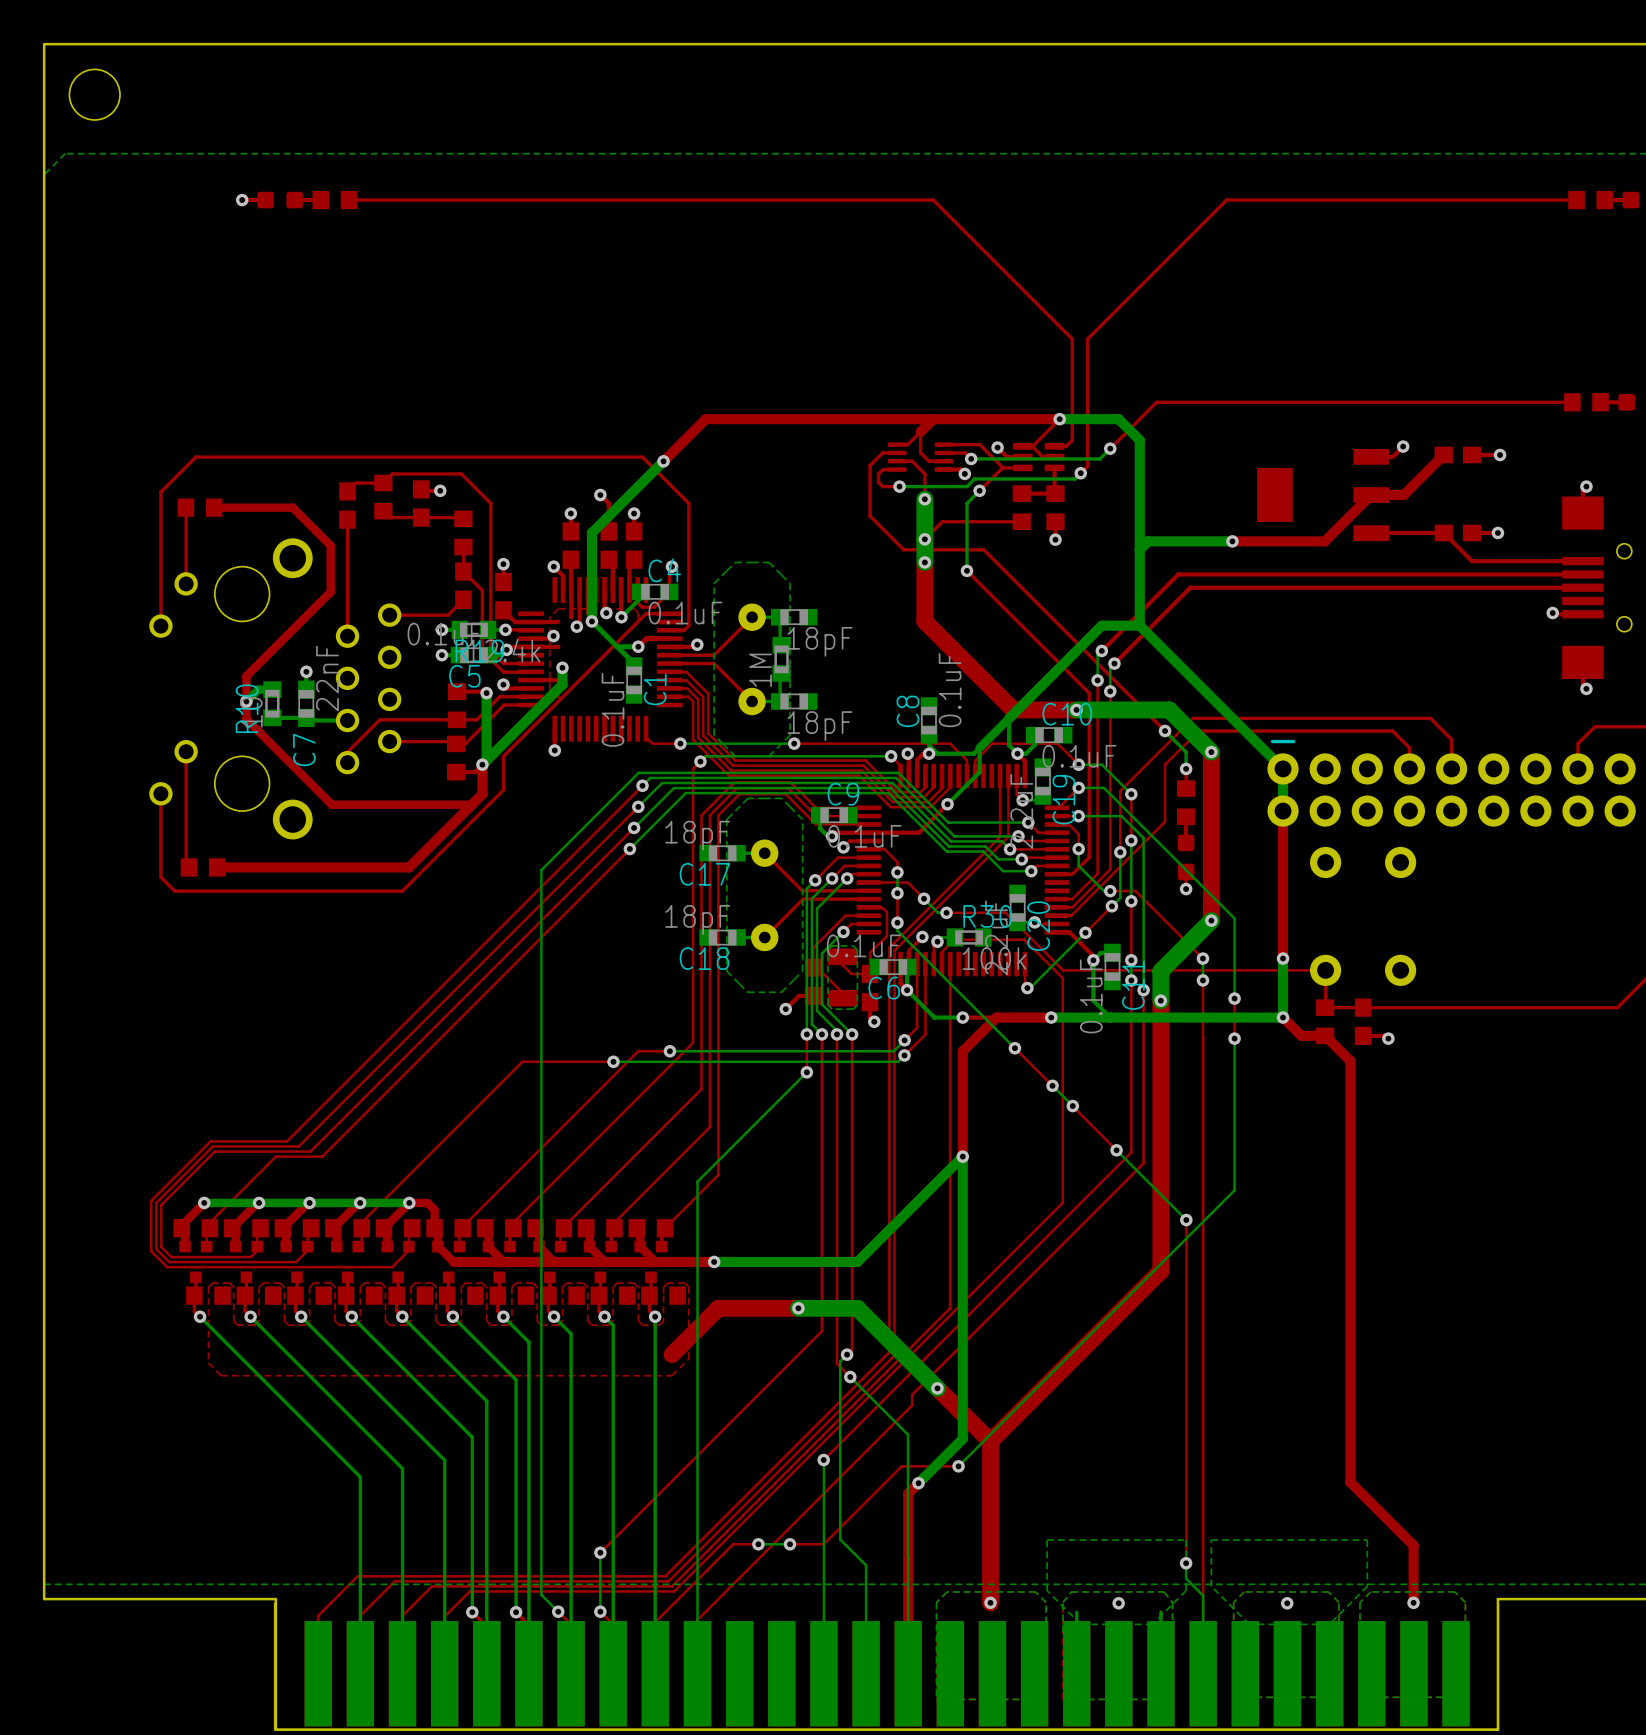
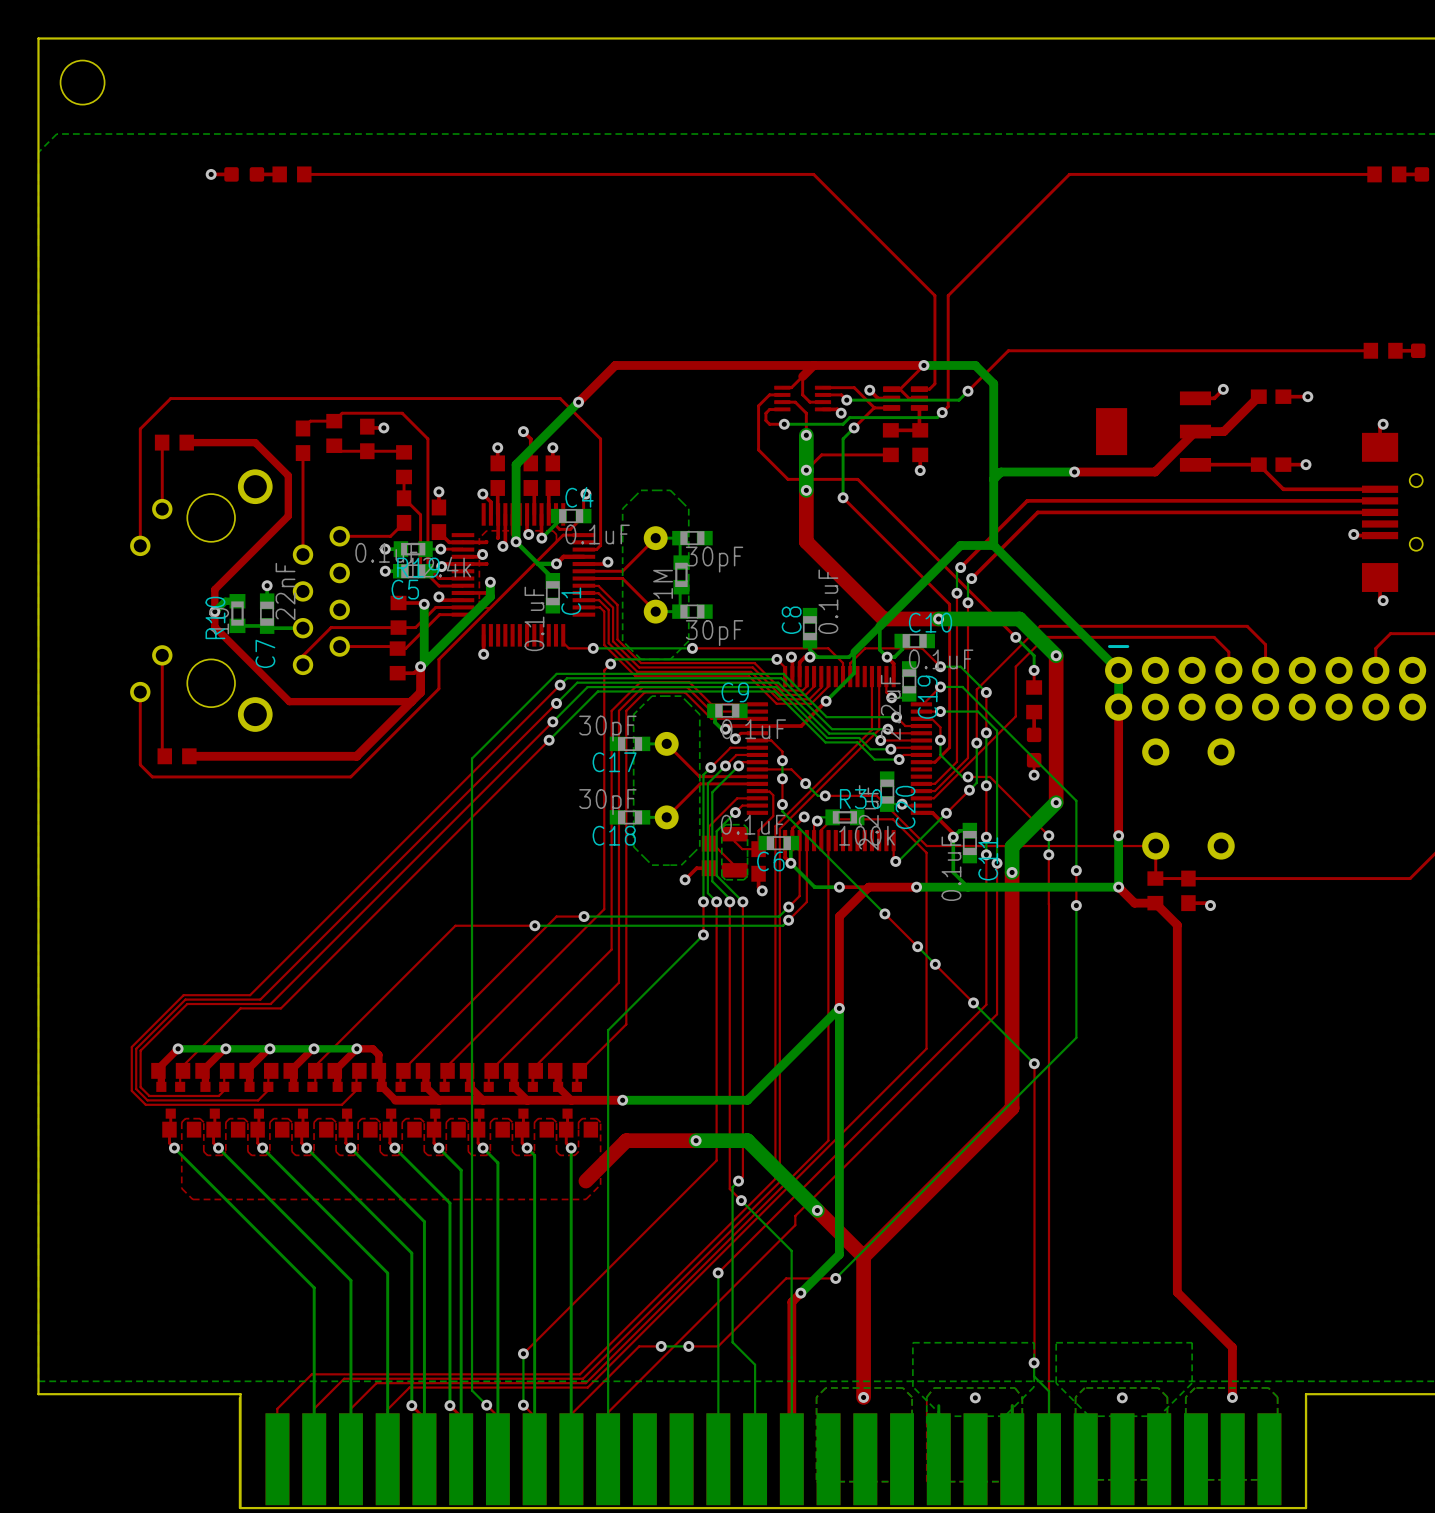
part value: 18pF (820, 641) -> 30pF (714, 559)
part value: 18pF (820, 726) -> 30pF (714, 633)
C17 value: 18pF (697, 835) -> 30pF (607, 728)
C18 value: 18pF (697, 919) -> 30pF (607, 802)

